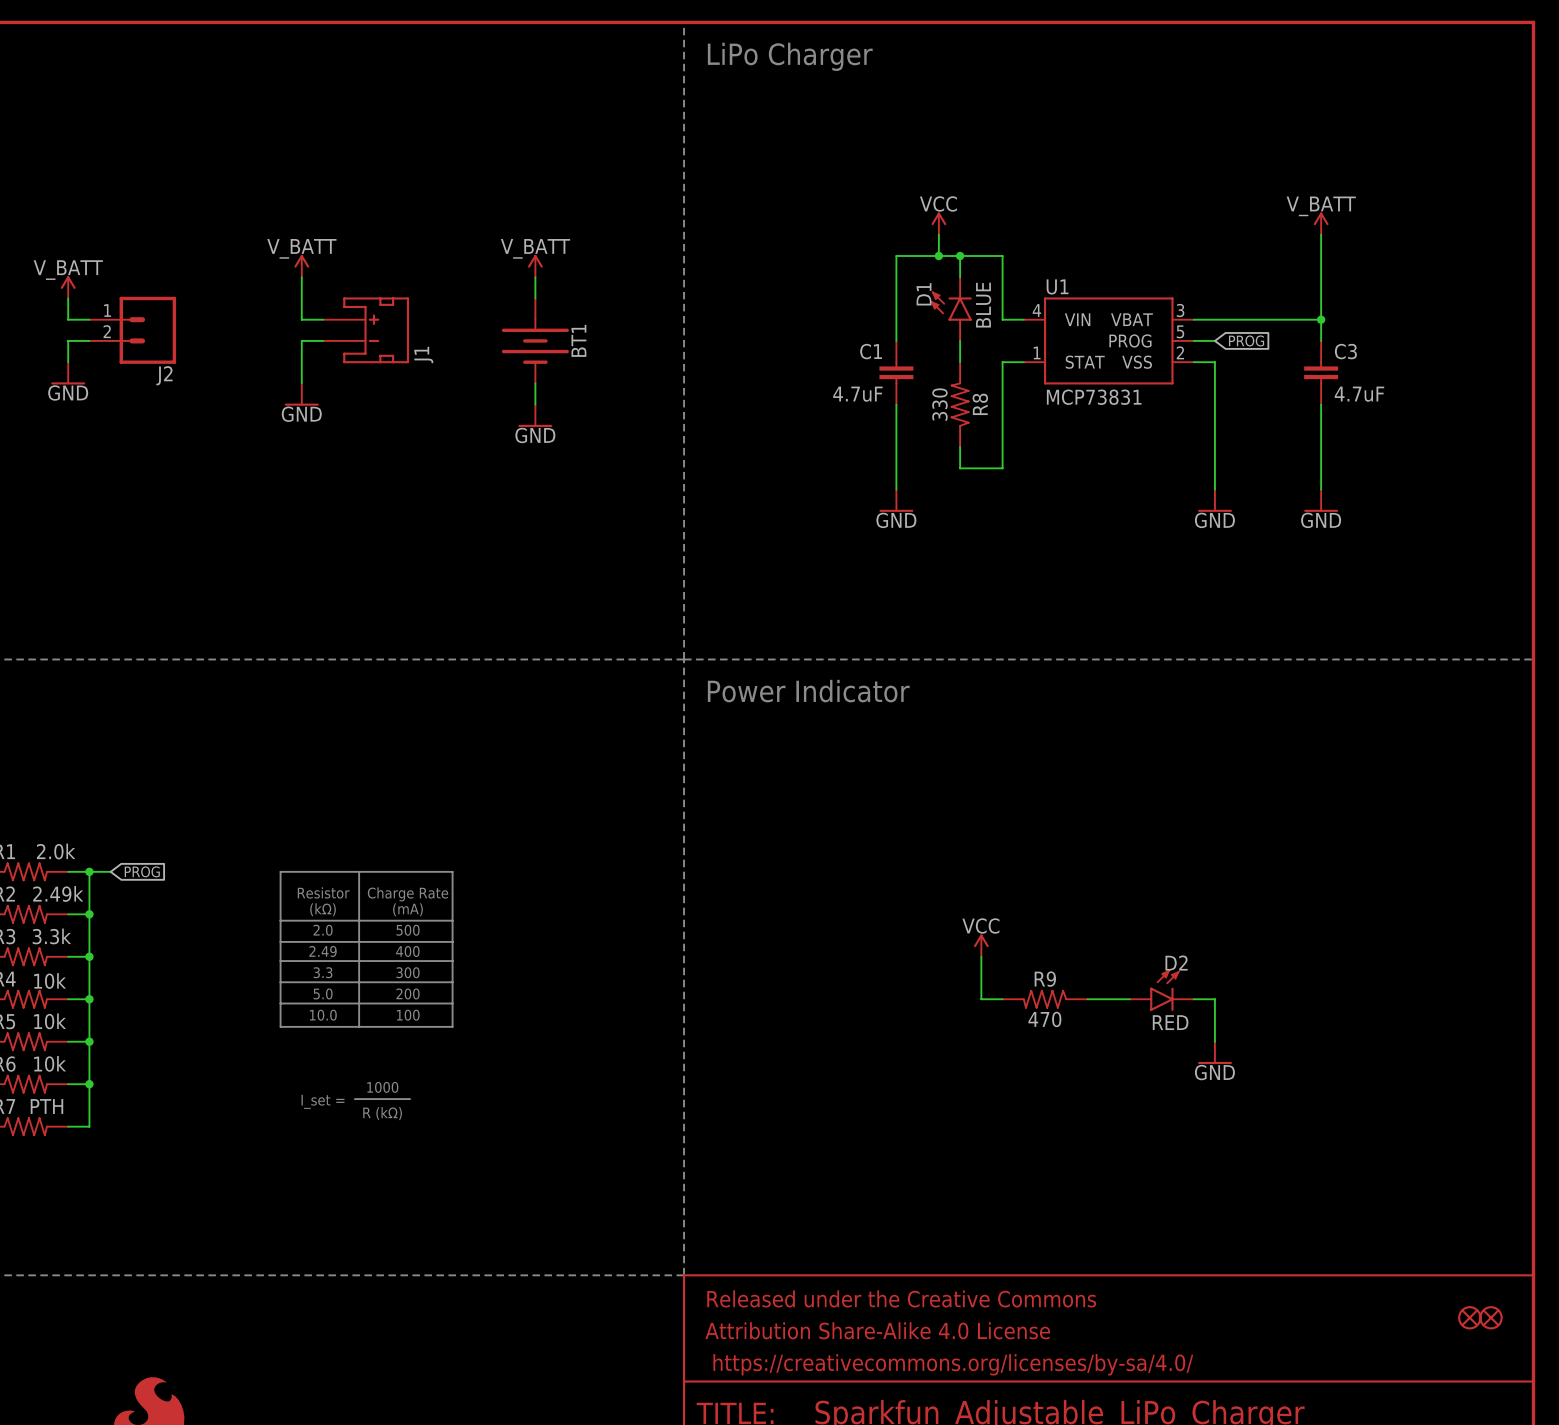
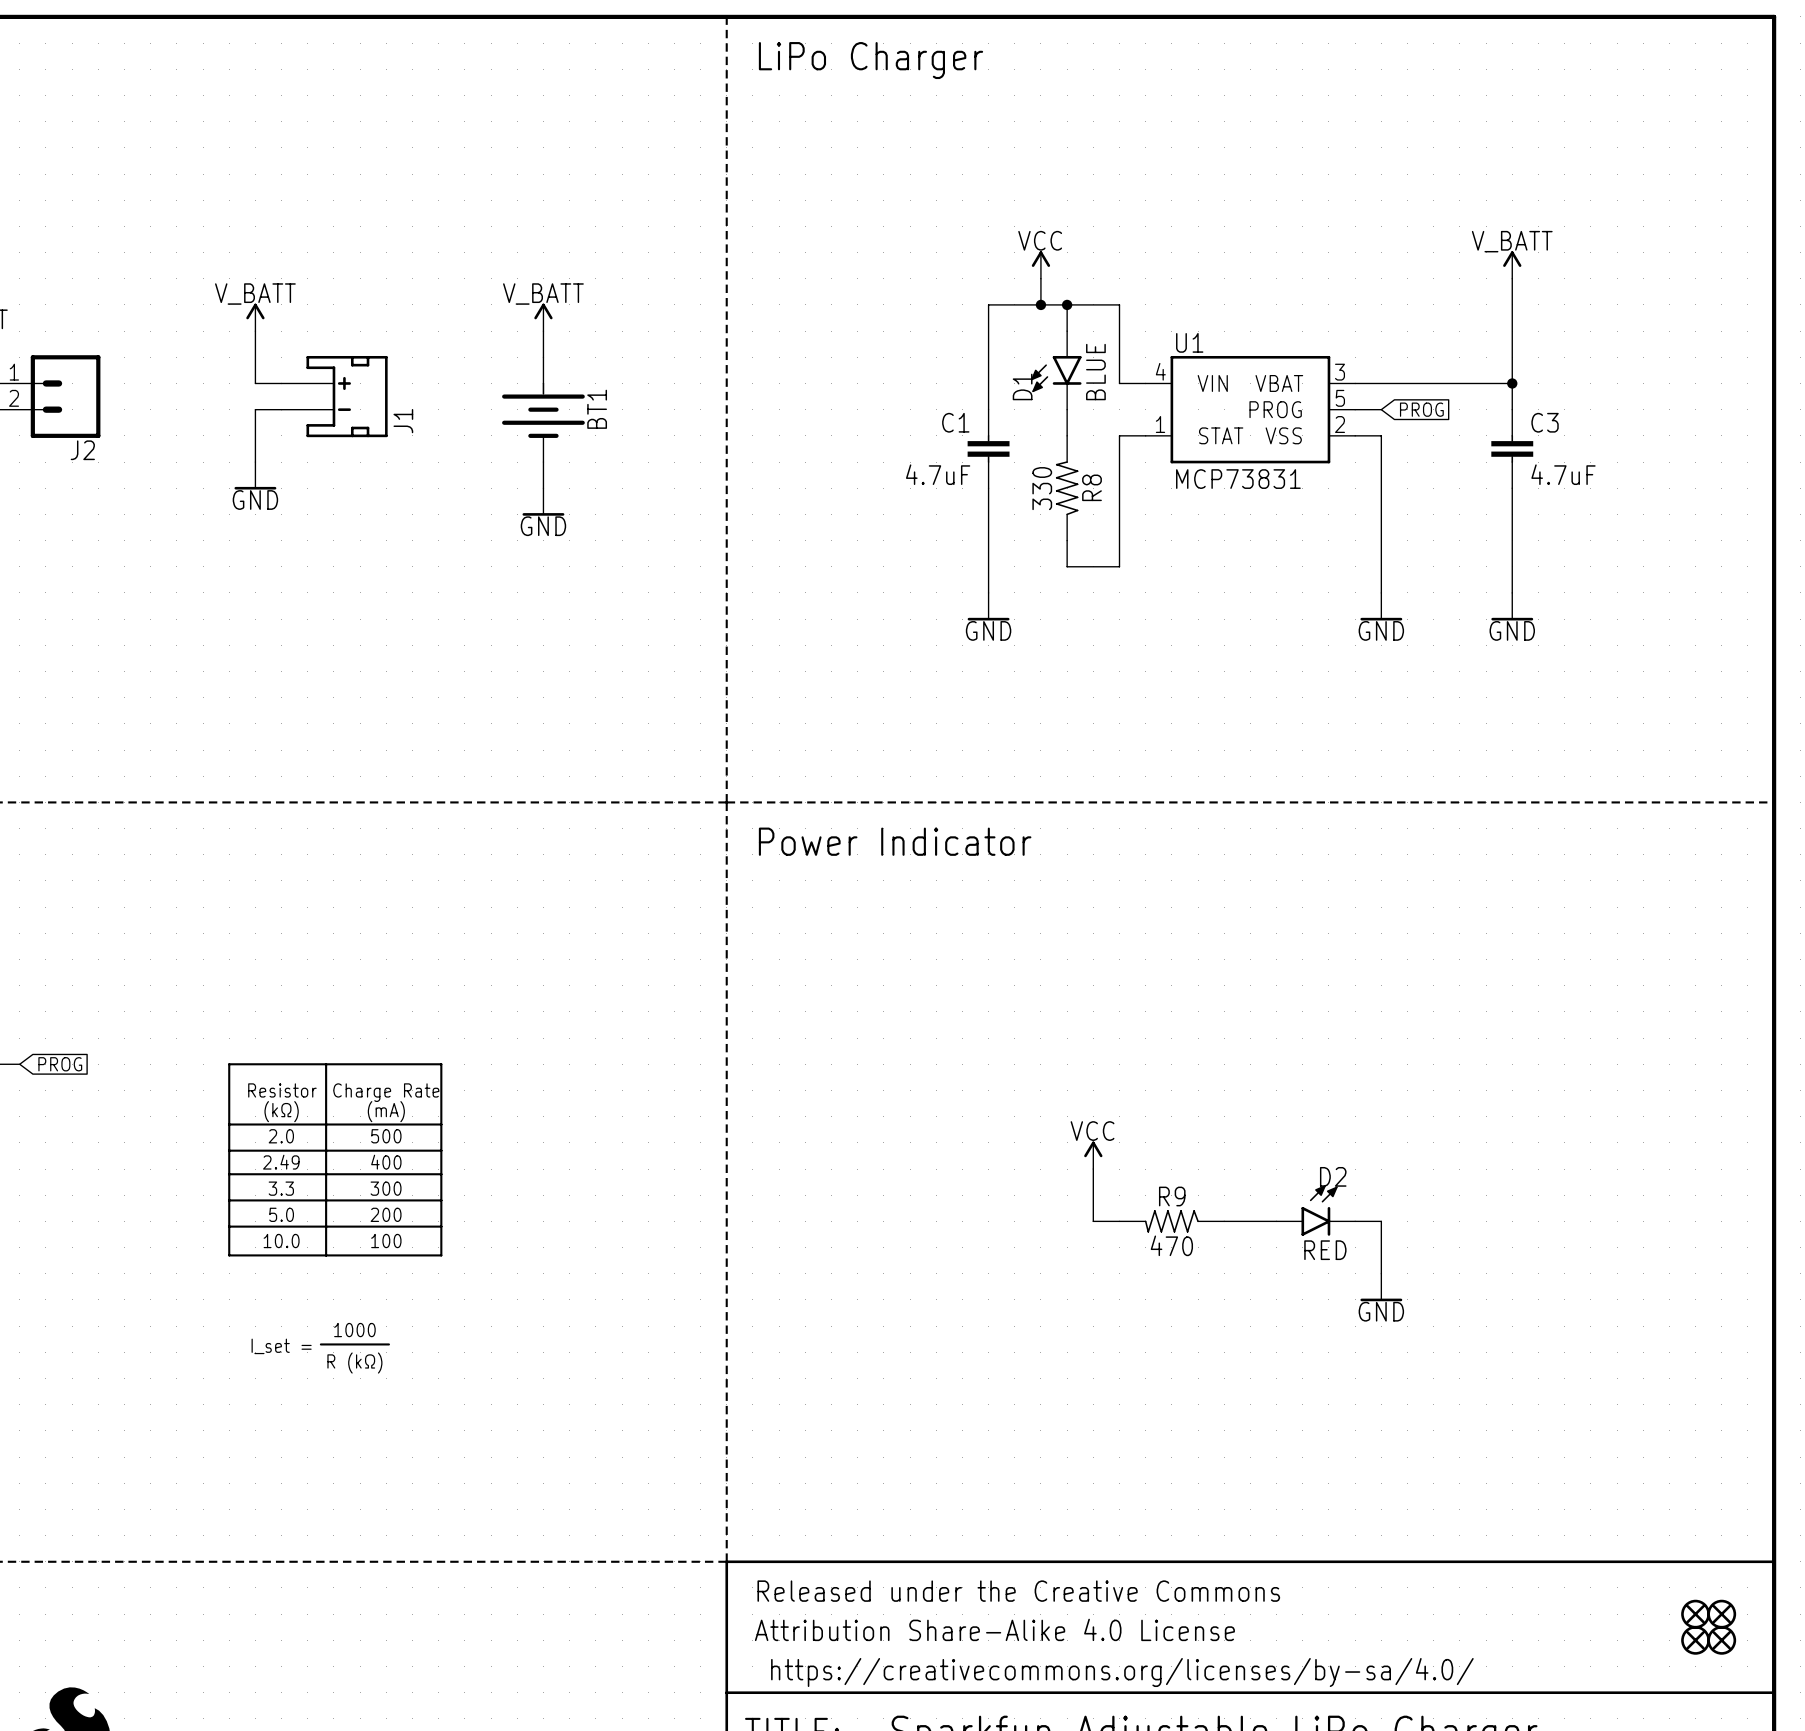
D1 flip: as is (951, 306) -> up-down (1056, 374)
part: none -> (1695, 1640)
part: none -> (1721, 1640)

